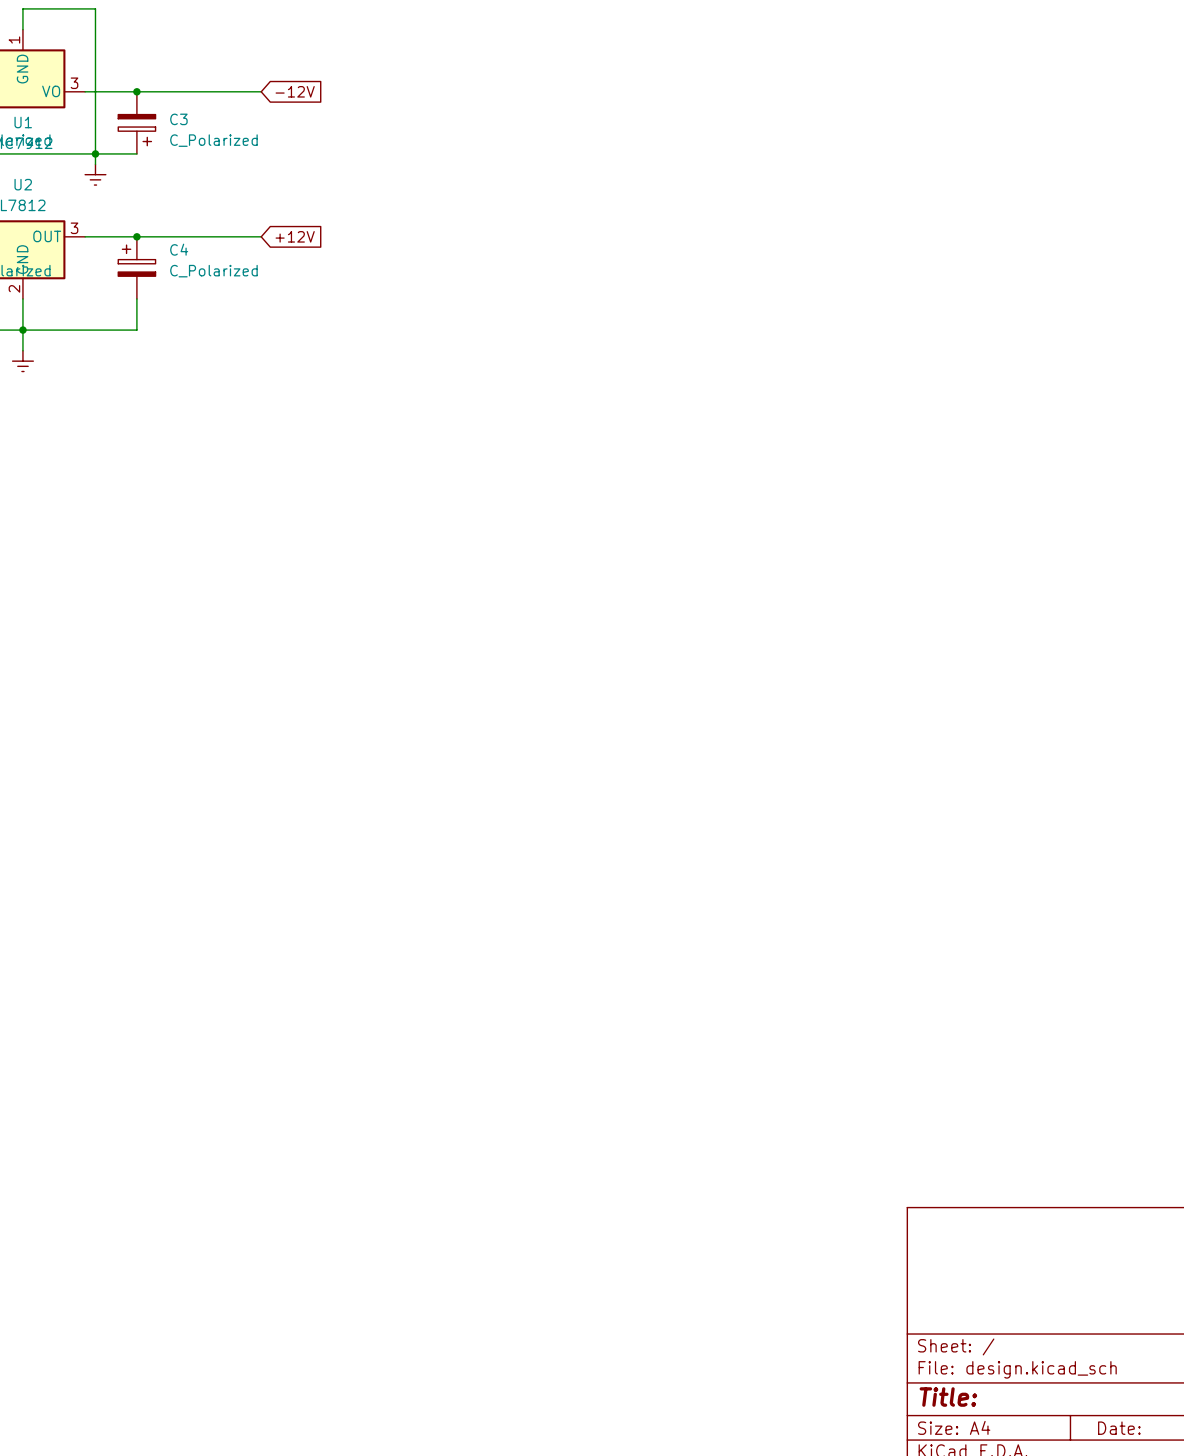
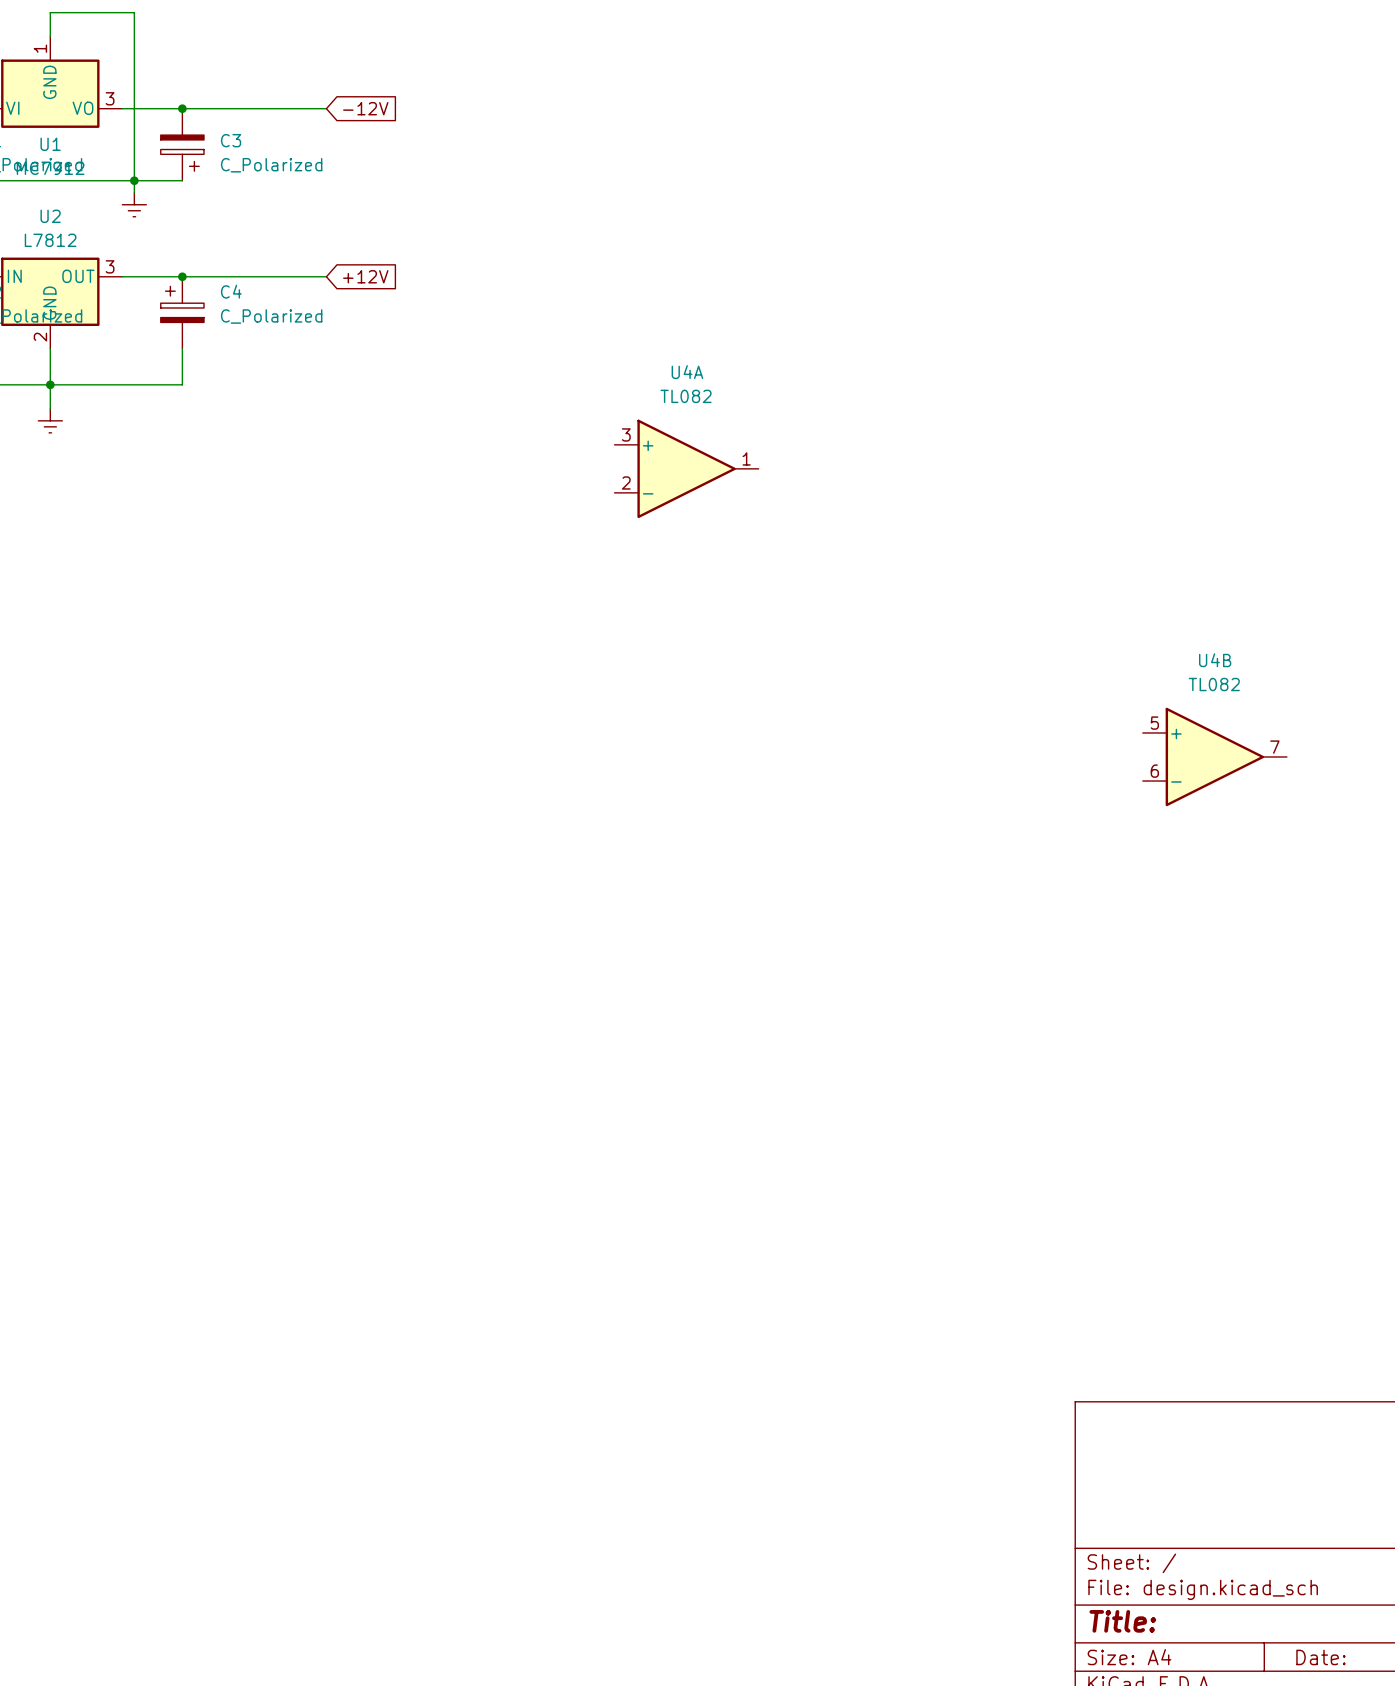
U4A: none -> TL082 (686, 468)
U4B: none -> TL082 (1214, 757)

